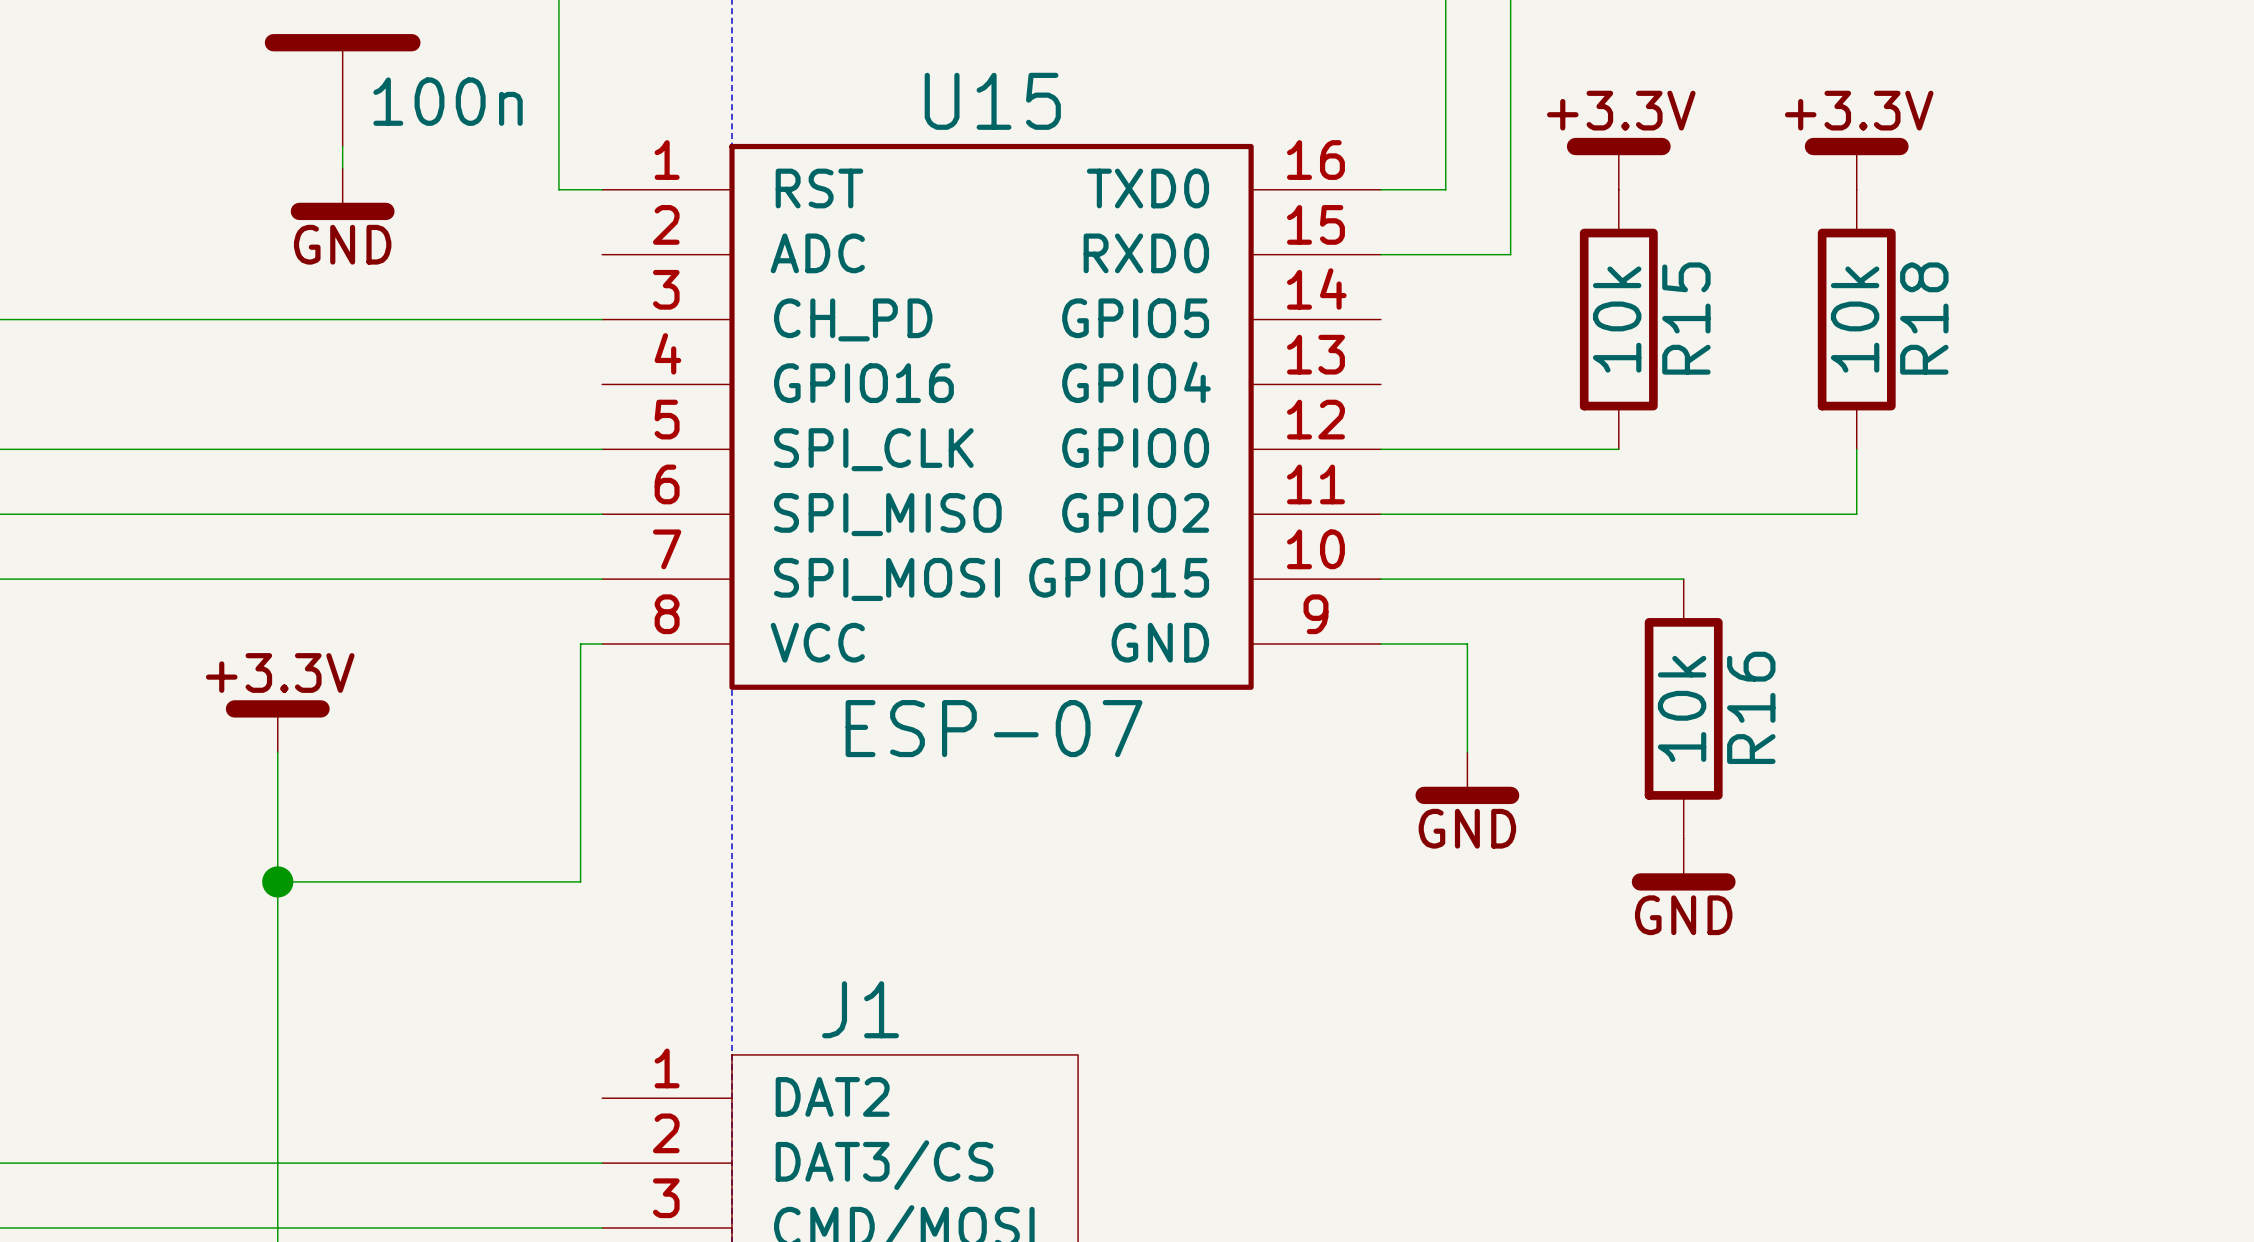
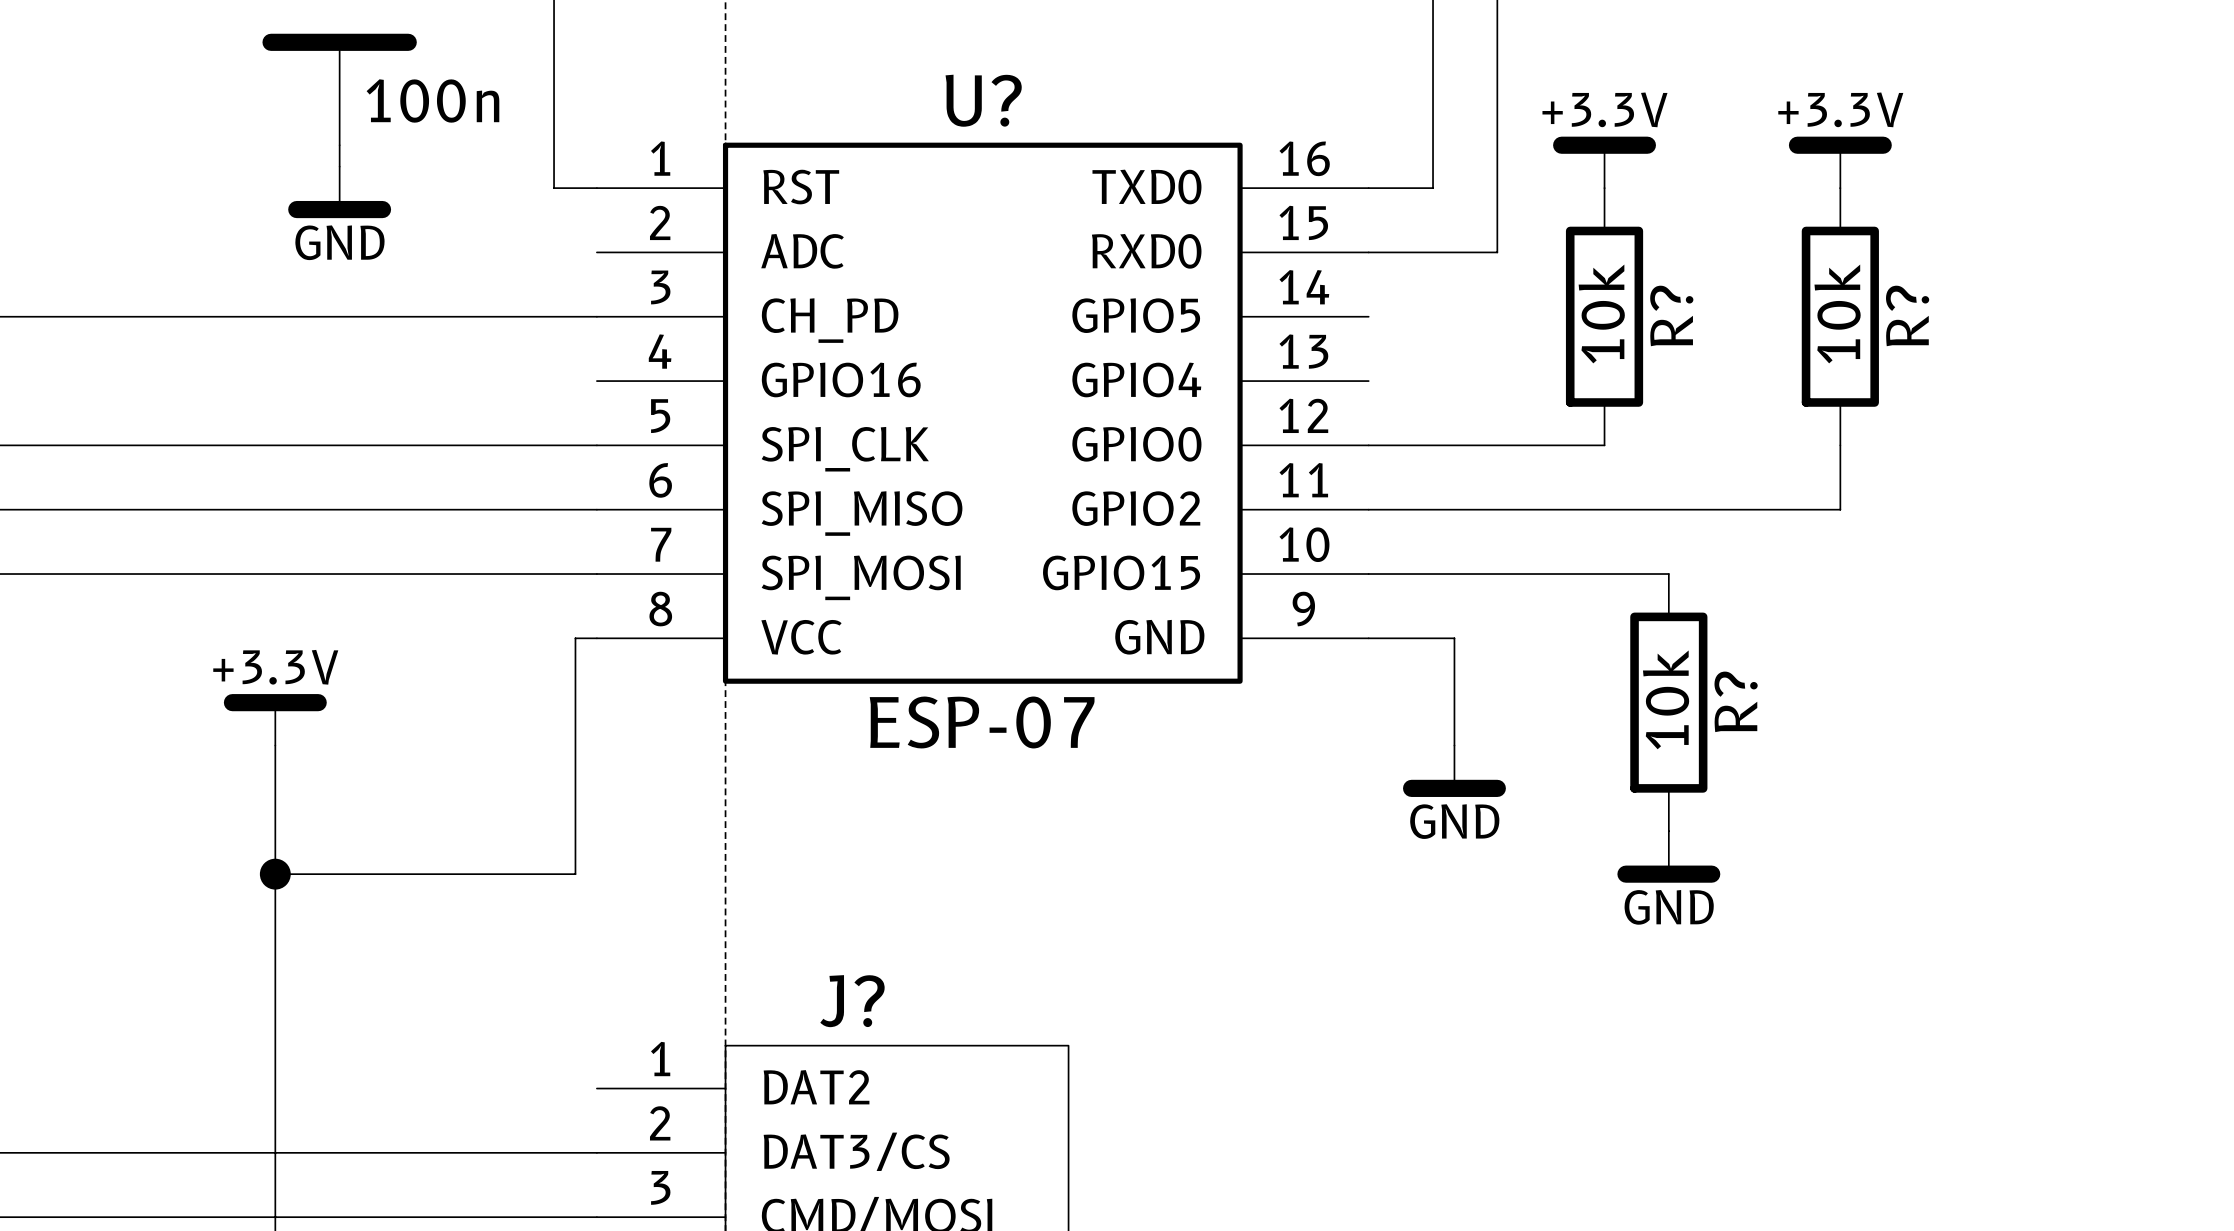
U15 name: U15 (992, 101) -> U? (983, 100)
R15 name: R15 (1686, 318) -> R? (1671, 315)
R18 name: R18 (1924, 318) -> R? (1907, 315)
R16 name: R16 (1751, 707) -> R? (1736, 701)
J1 name: J1 (860, 1009) -> J? (852, 1001)

